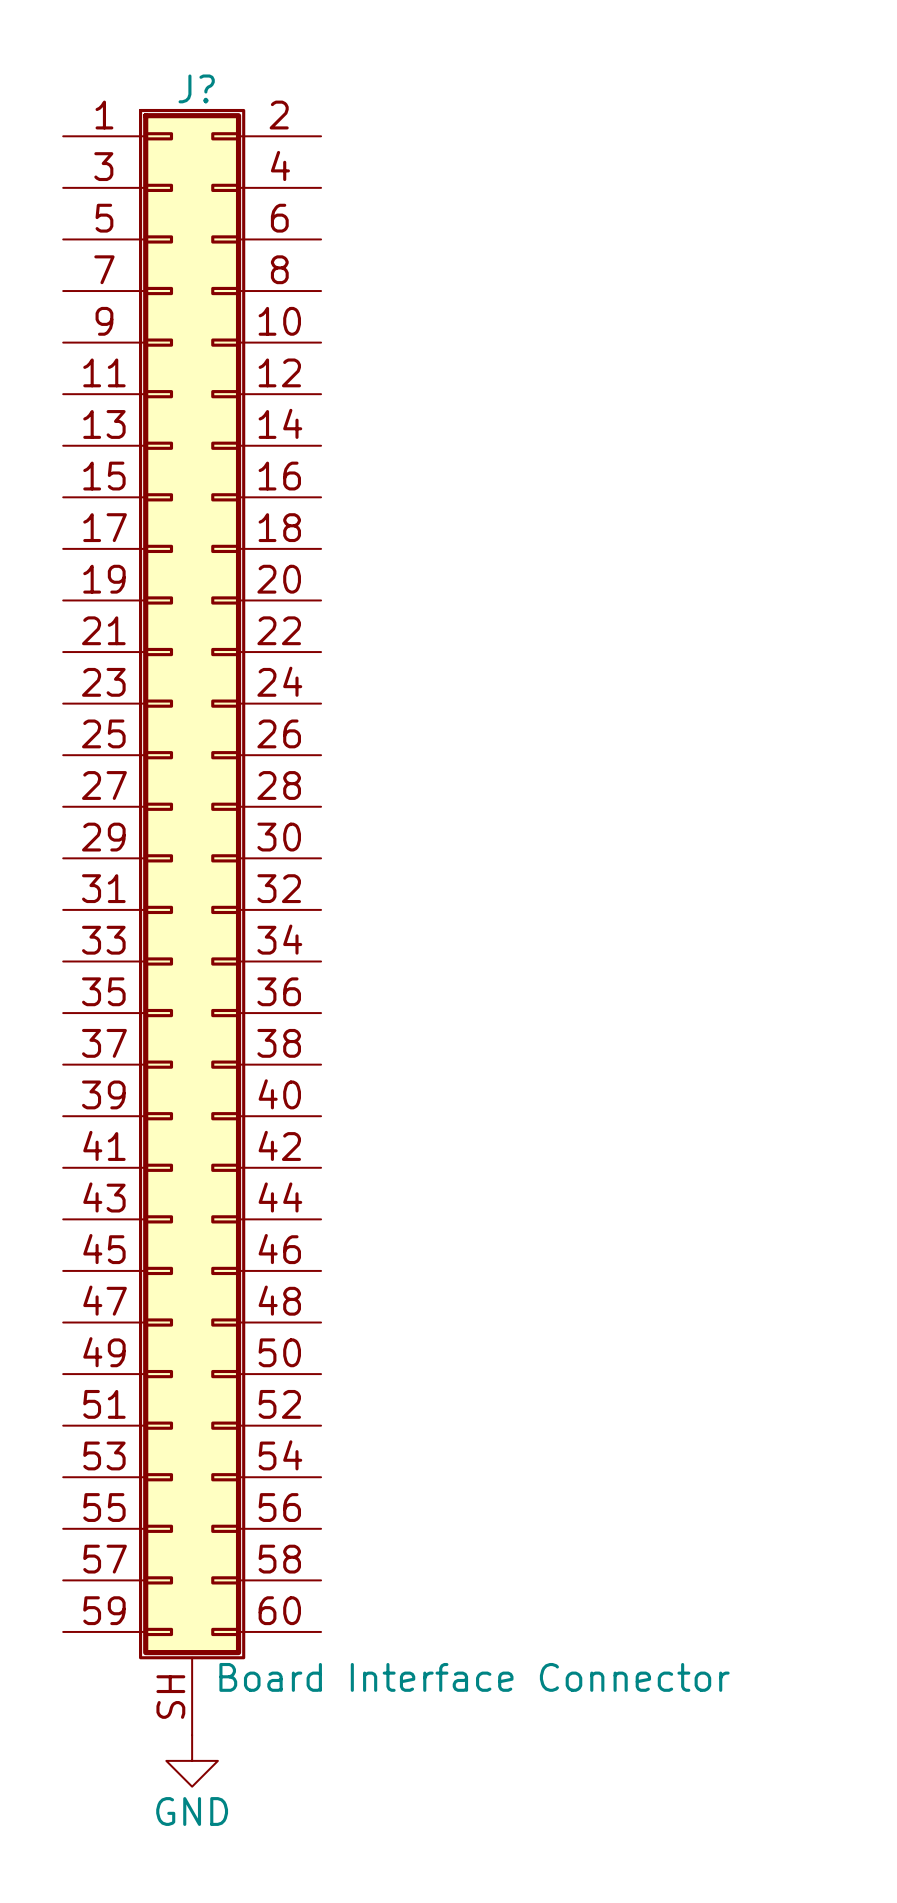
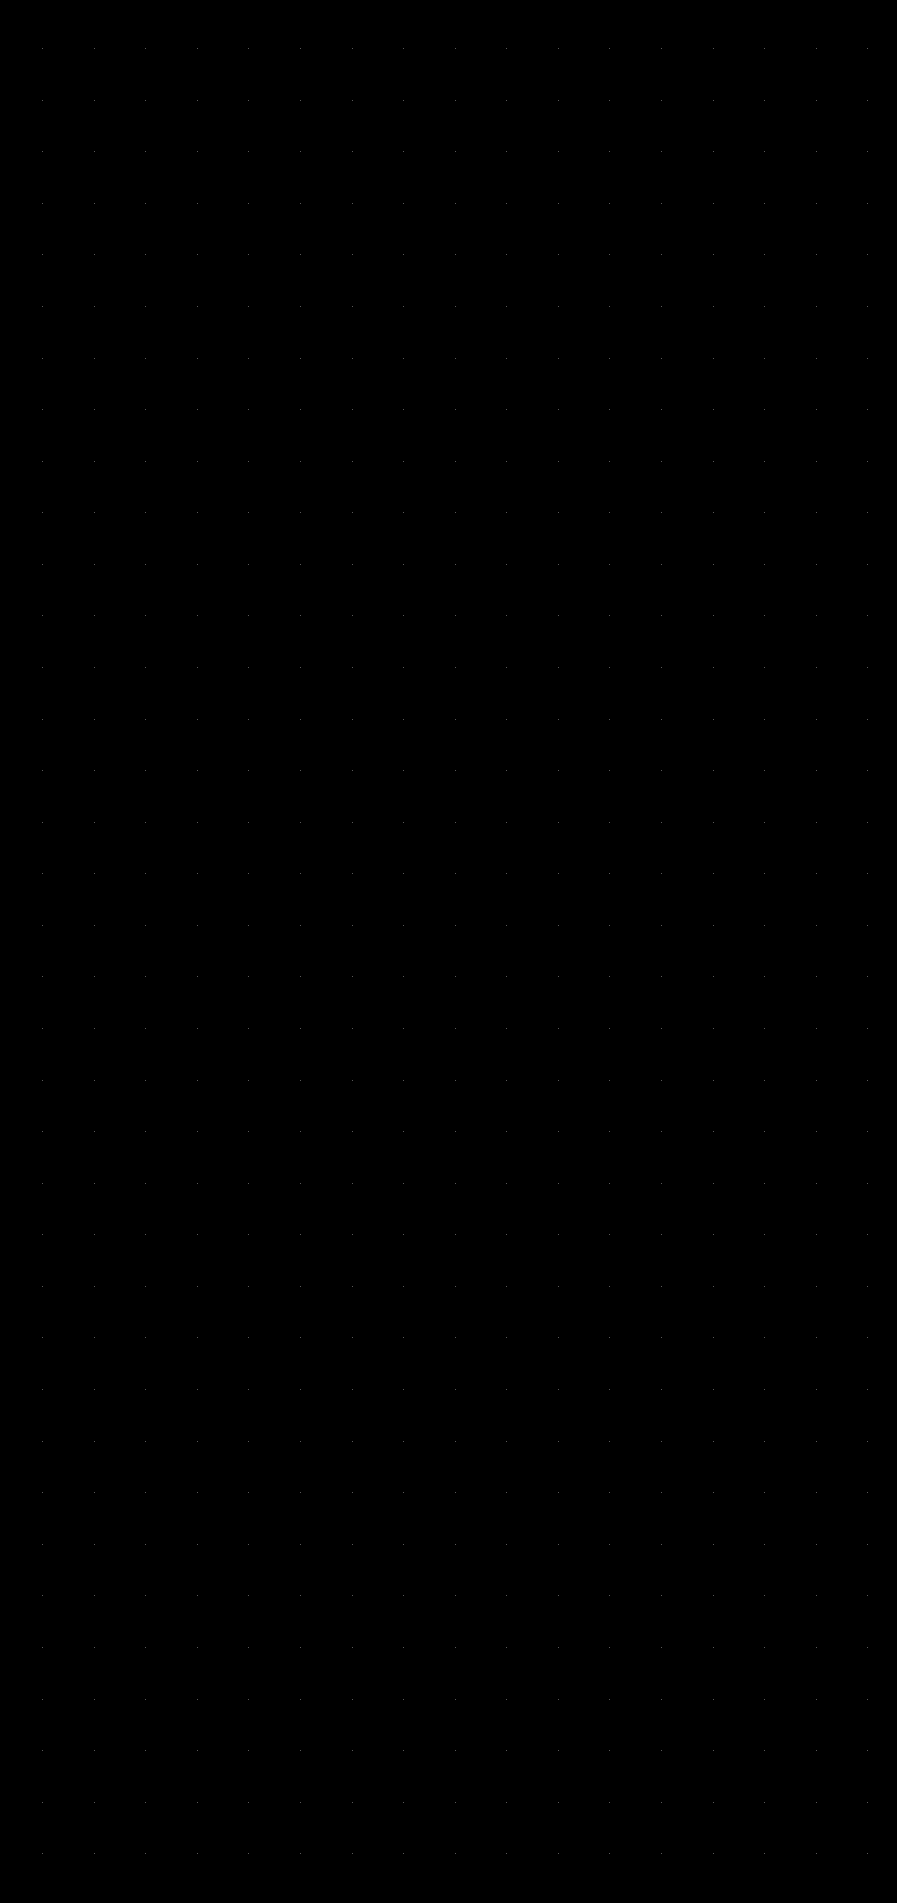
J?: Board Interface Connector (192, 922) -> none
power symbol: GND (192, 1760) -> none

